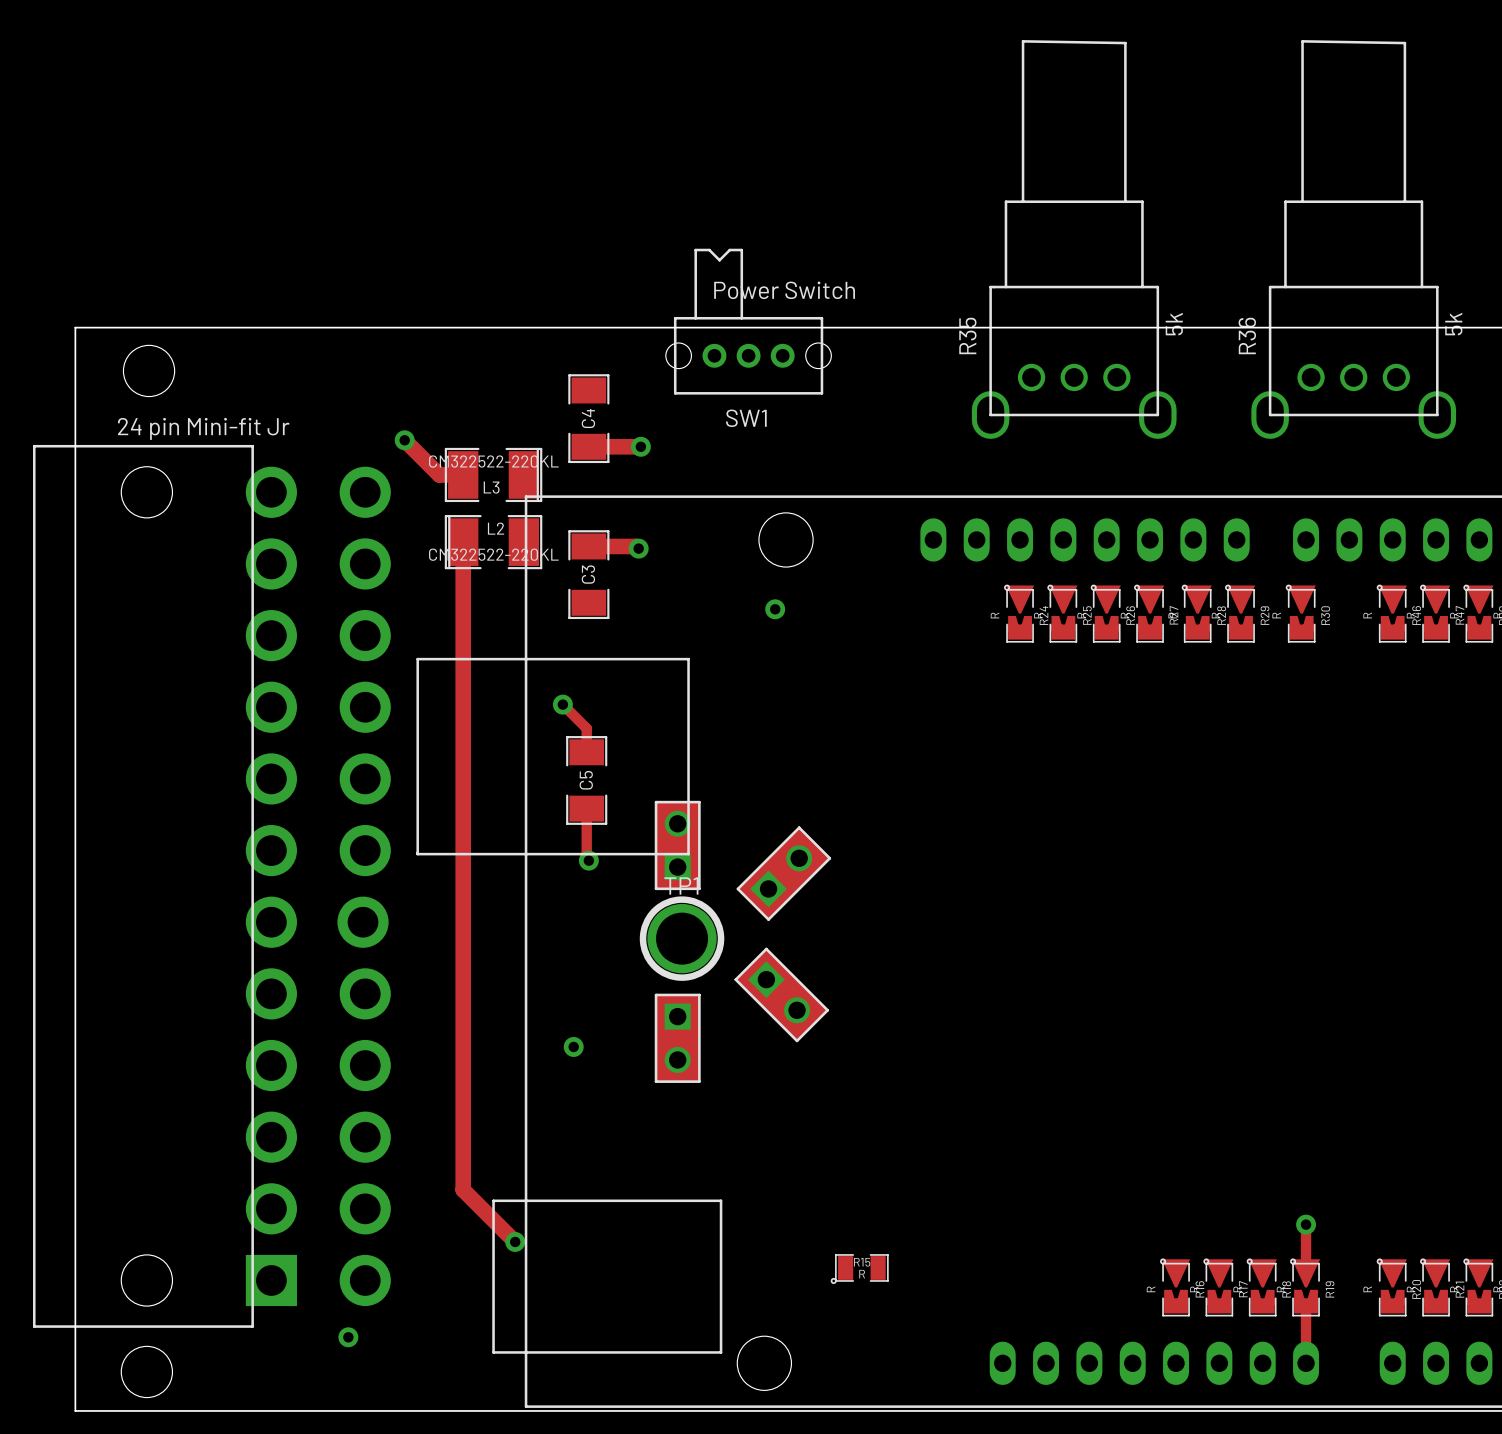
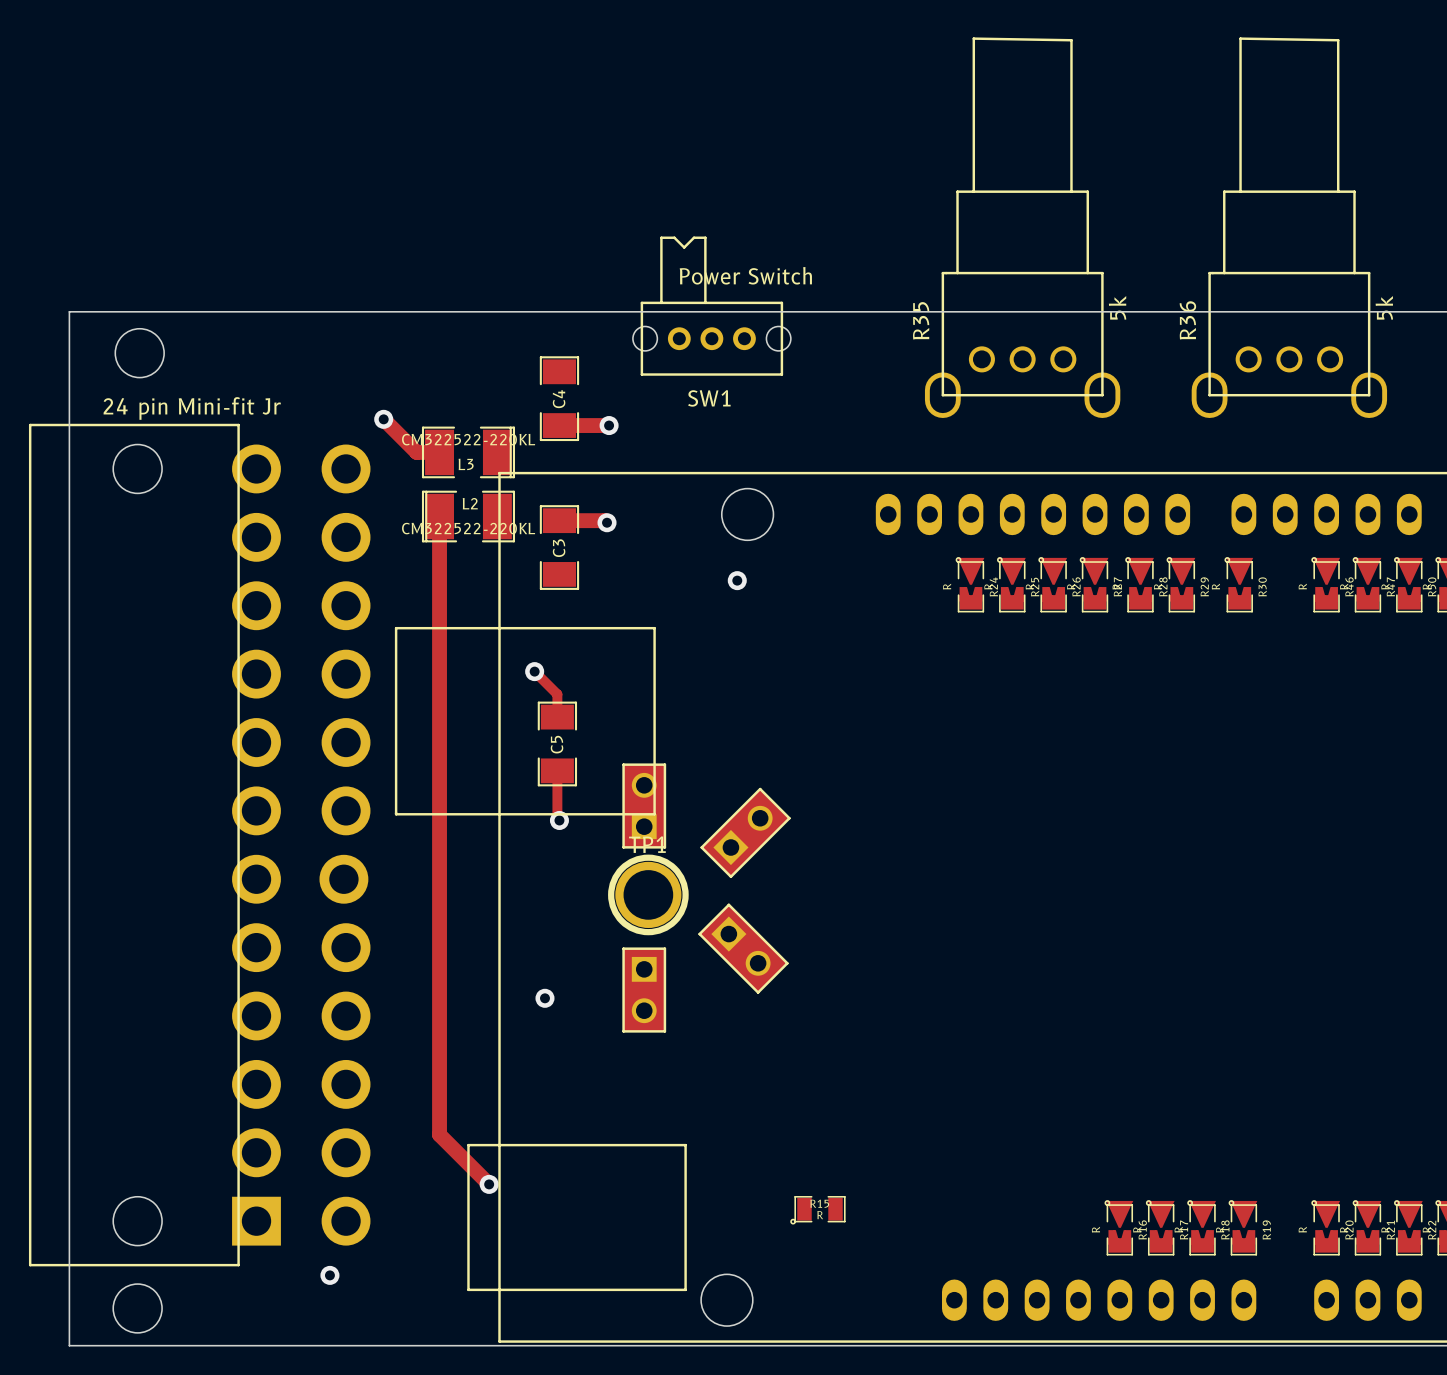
track: (1306, 1224) (1306, 1273) -> none
via: (1306, 1224) -> none
track: (1306, 1305) (1306, 1363) -> none

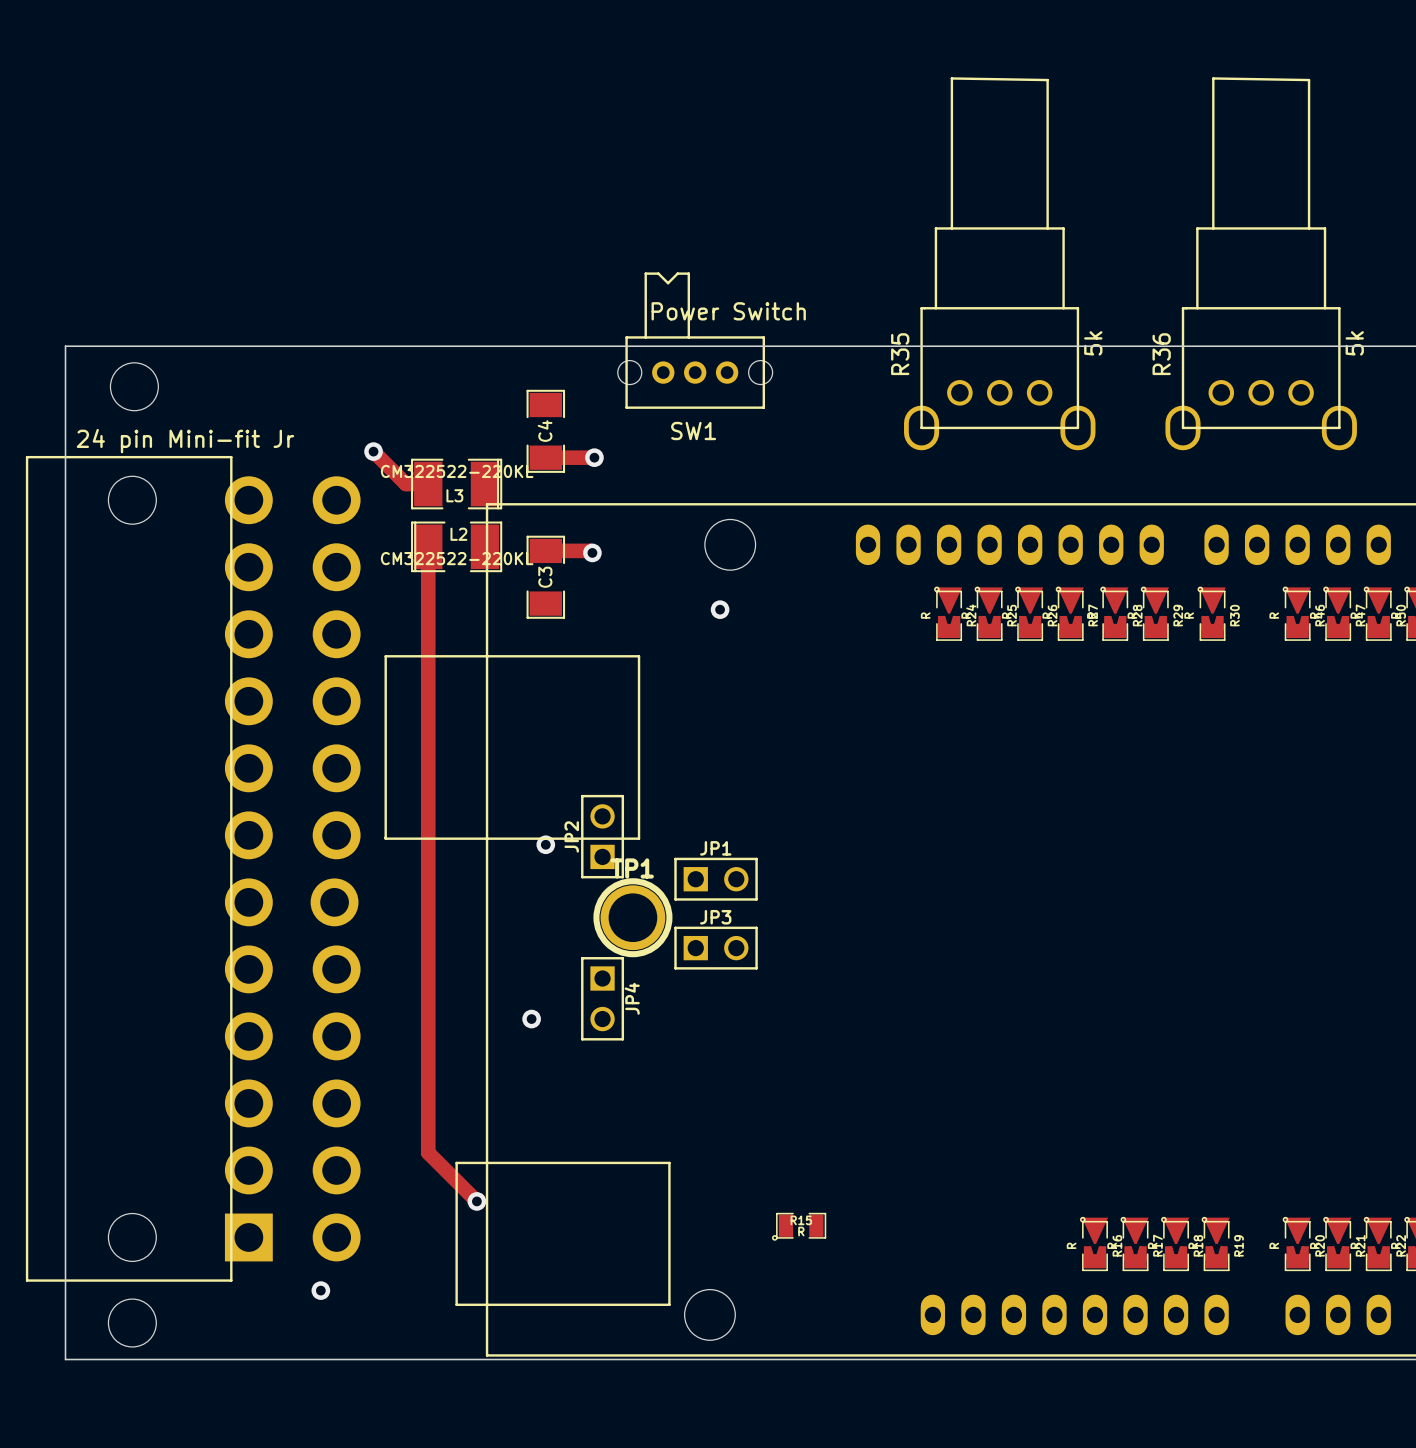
track: (534, 671) (557, 694) (557, 717) -> none
via: (534, 671) -> none
C5: (557, 743) -> none
track: (557, 770) (557, 818) (559, 820) -> none
part: (644, 806) -> none
JP2: none -> (602, 836)
part: (745, 832) -> none
JP1: none -> (716, 879)
JP3: none -> (716, 948)
part: (743, 948) -> none
JP4: none -> (602, 998)
part: (644, 990) -> none

